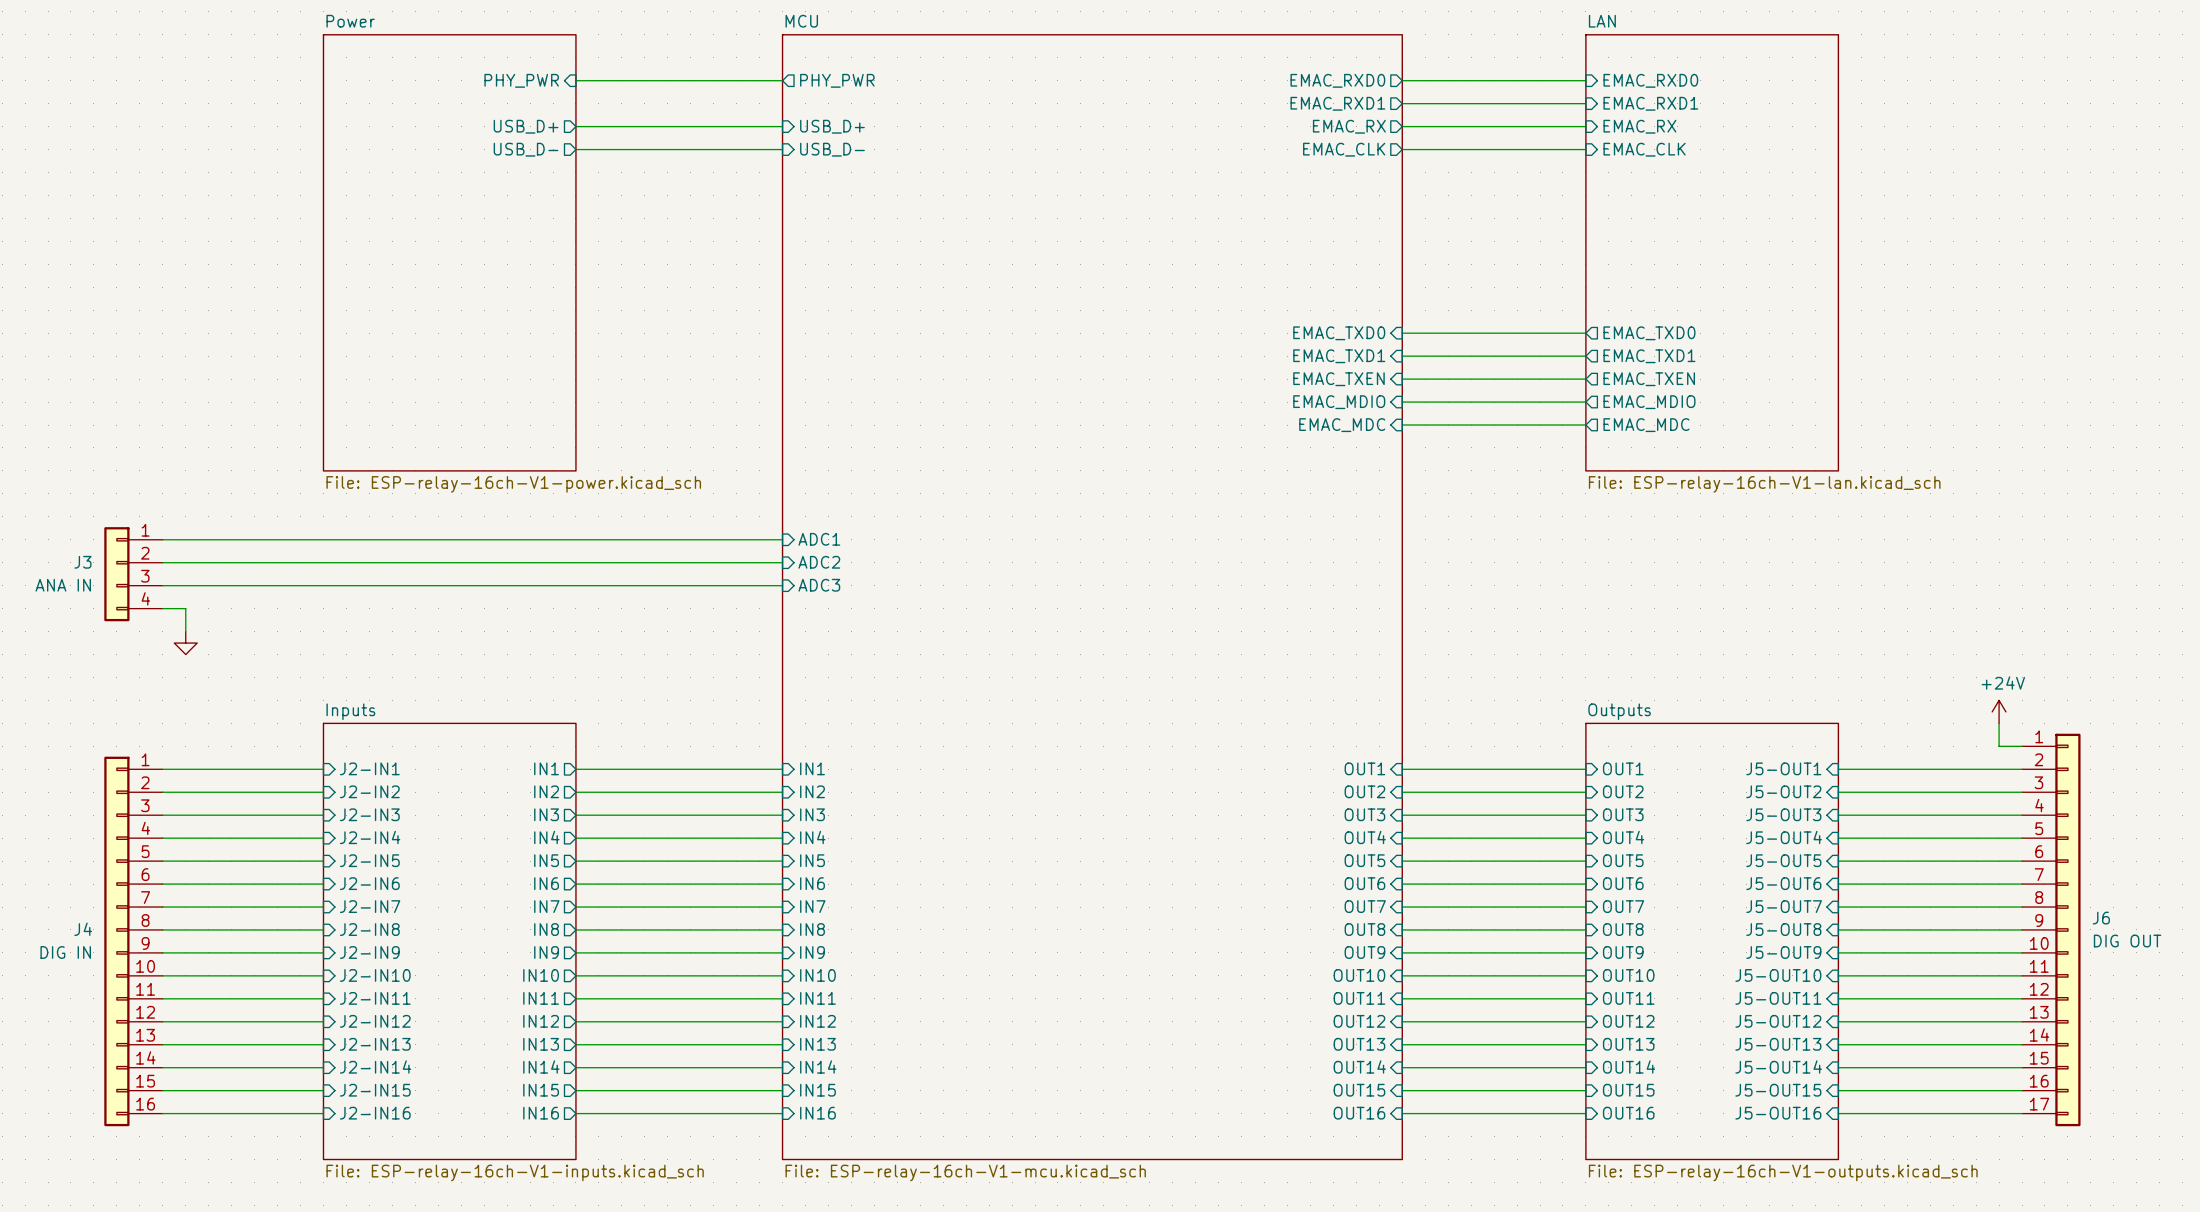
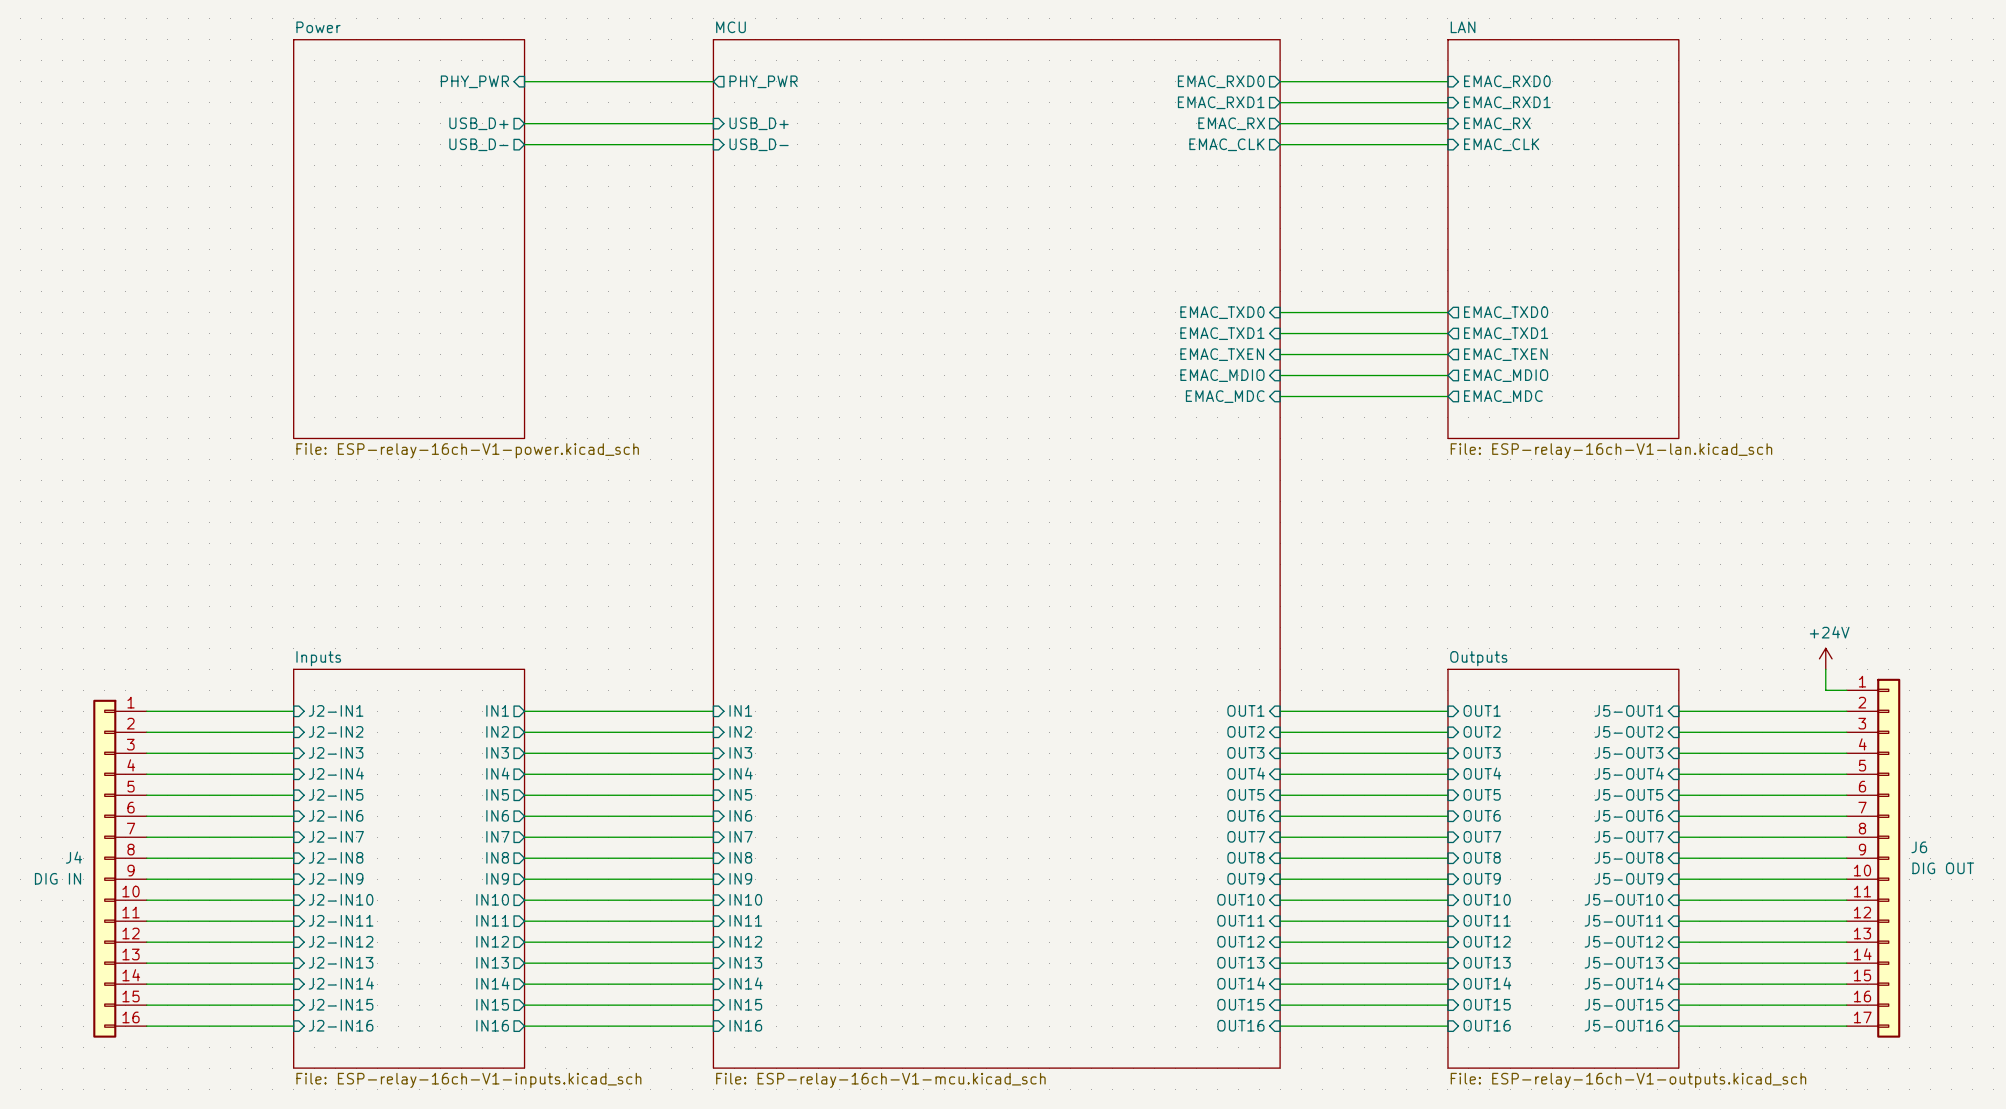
wire: (162, 539) (782, 539) -> none
sheet pin: ADC1 (819, 539) -> none
wire: (162, 562) (782, 562) -> none
sheet pin: ADC2 (819, 562) -> none
J3: ANA IN (133, 574) -> none
wire: (162, 585) (782, 585) -> none
sheet pin: ADC3 (819, 585) -> none
wire: (162, 608) (185, 608) (185, 631) -> none
power symbol: (185, 643) -> none

